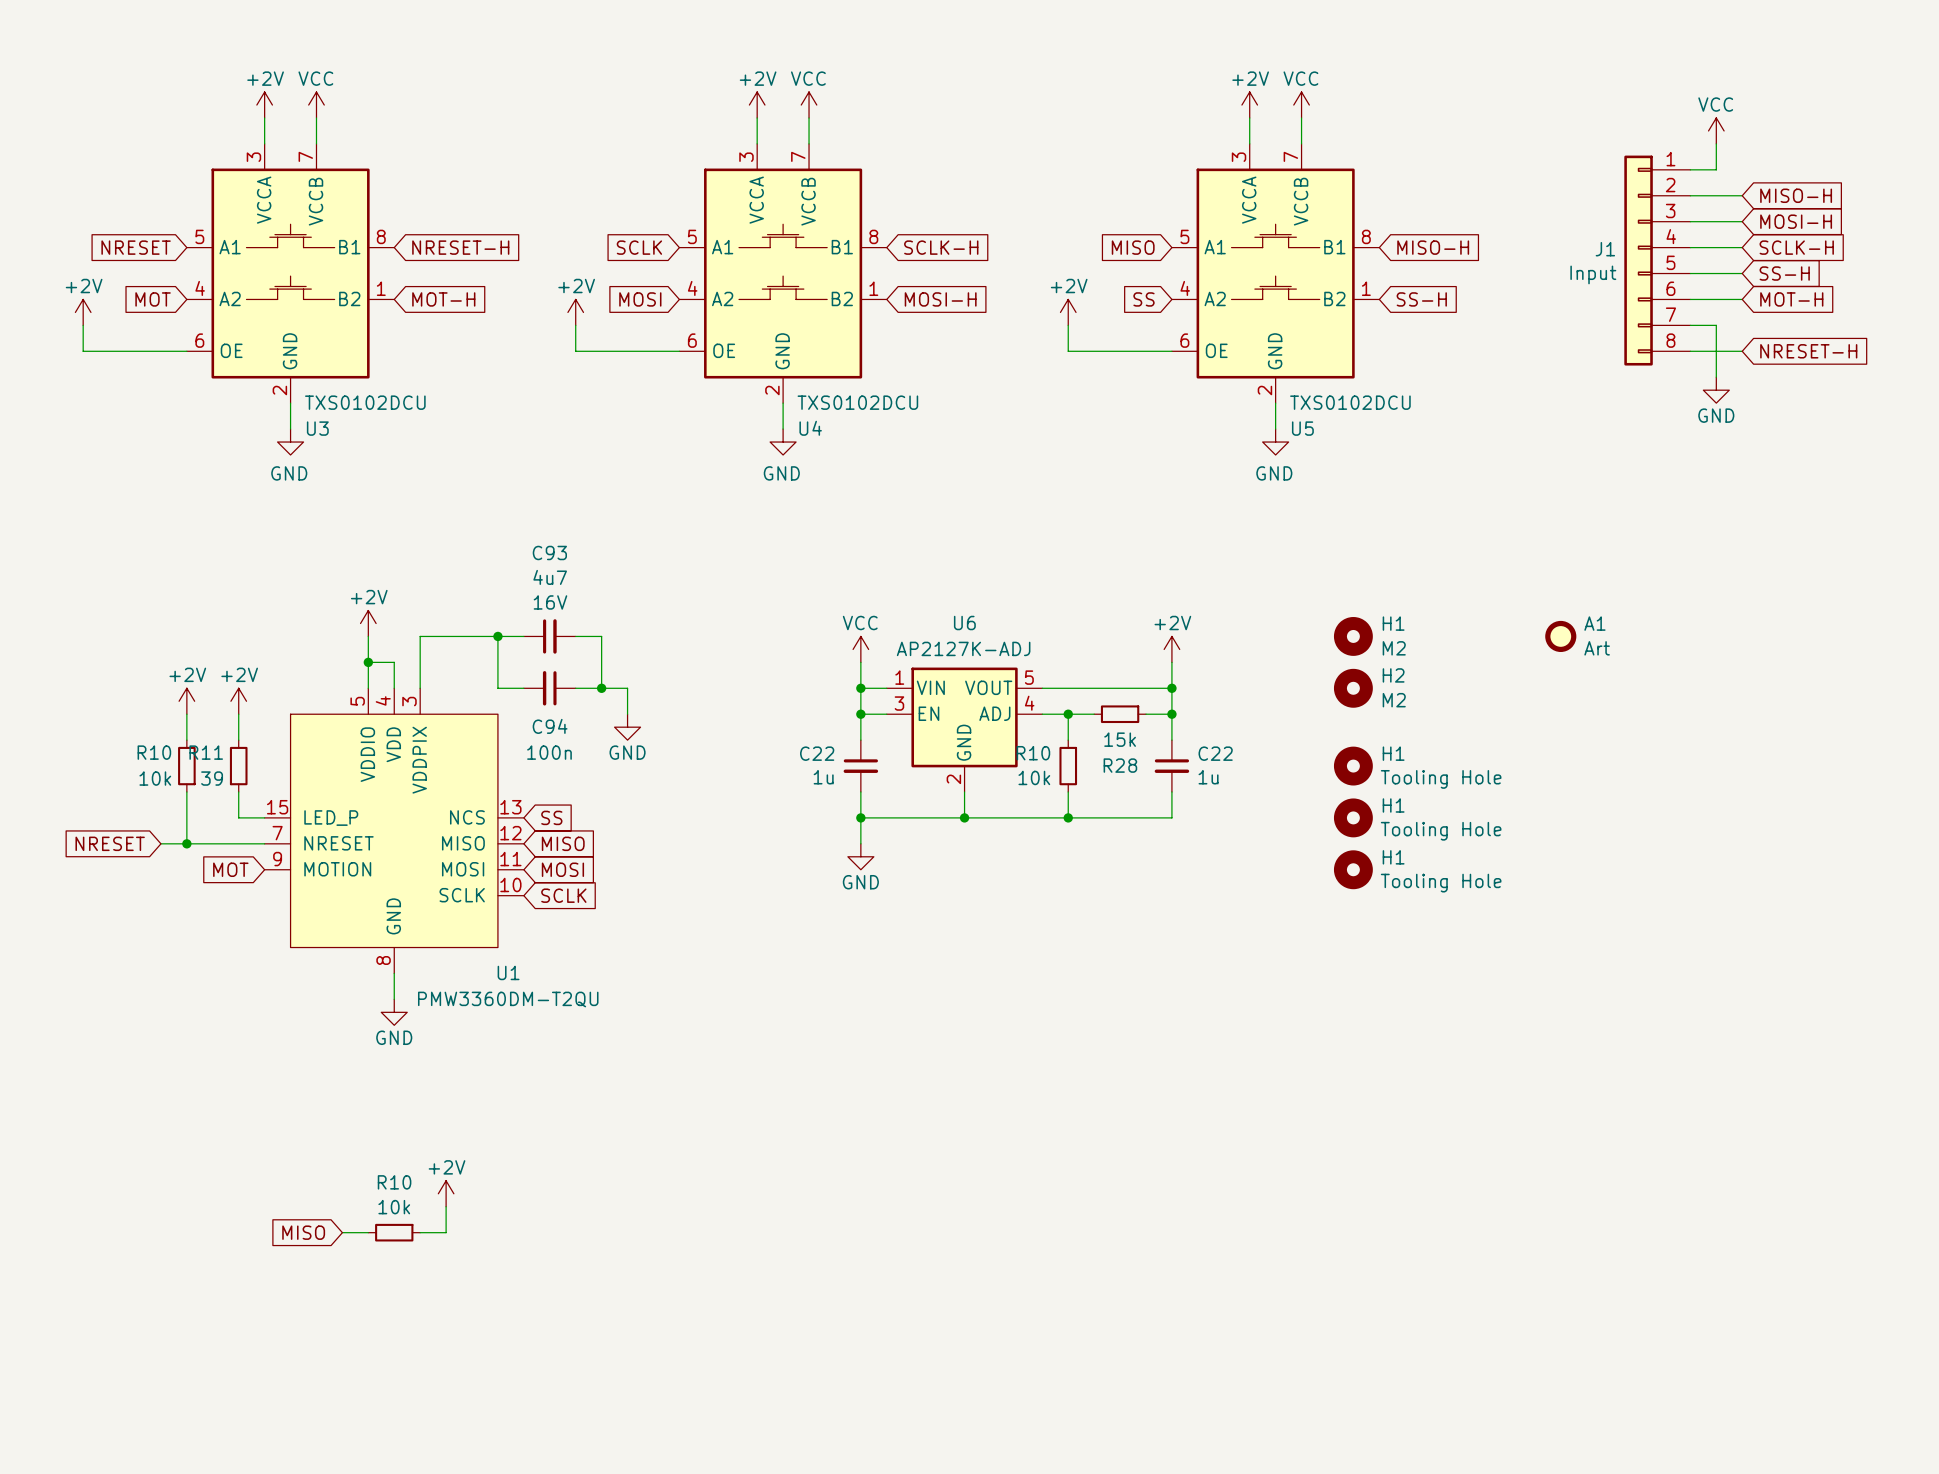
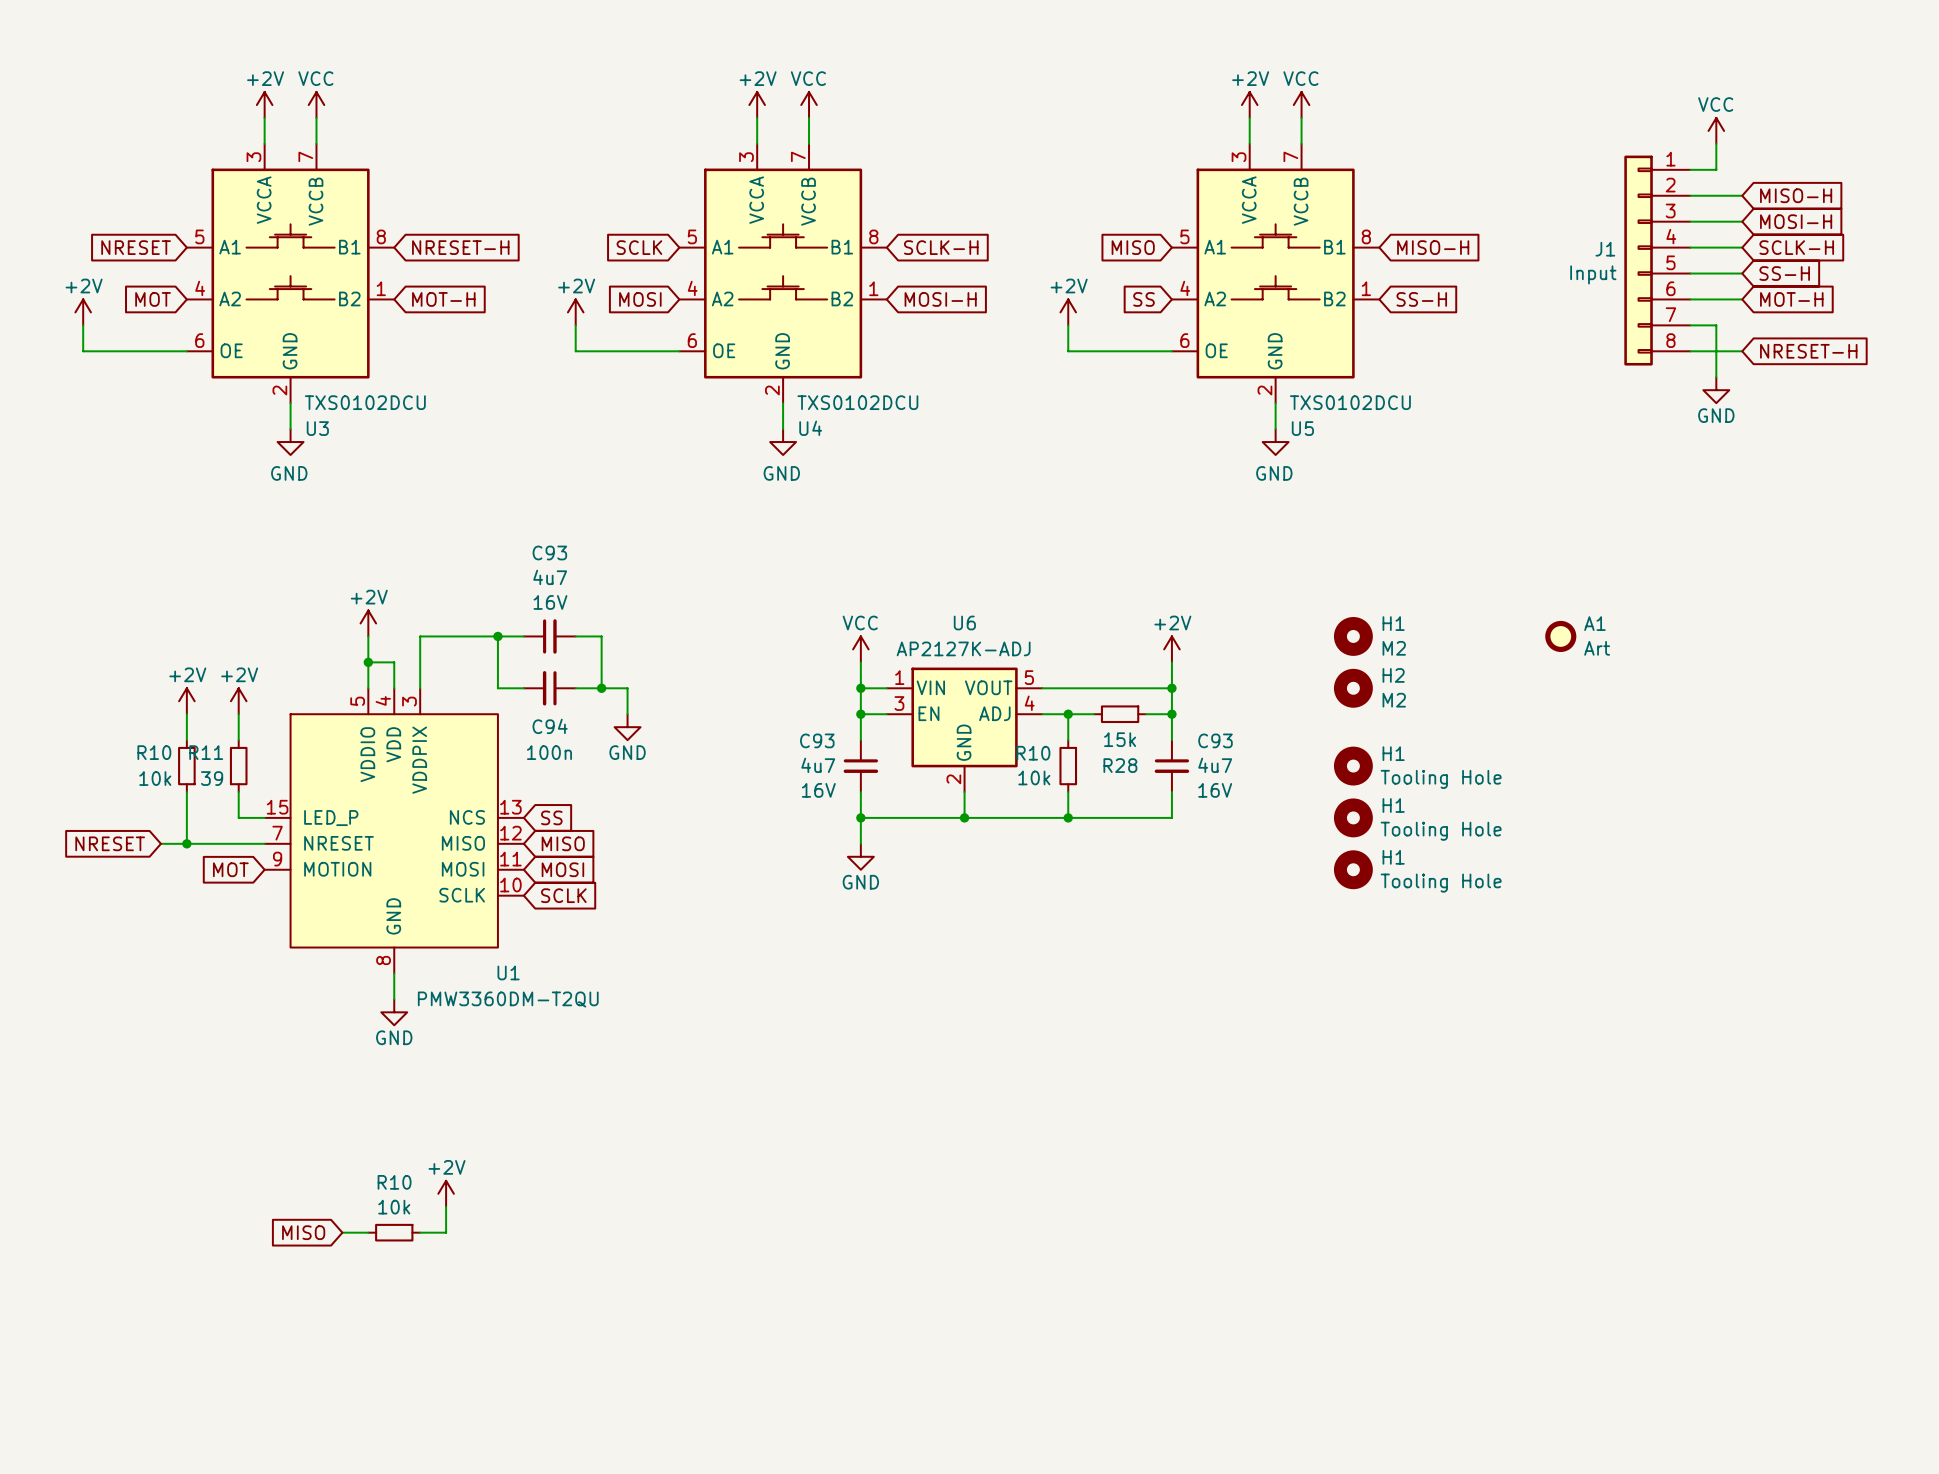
C22 name: C22 (817, 753) -> C93 (817, 740)
C22 name: C22 (1215, 753) -> C93 (1215, 740)
C22 value: 1u (823, 777) -> 4u7 (818, 765)
C22 value: 1u (1208, 777) -> 4u7 (1215, 765)
C22 text: none -> 16V (818, 790)
C22 text: none -> 16V (1215, 790)

